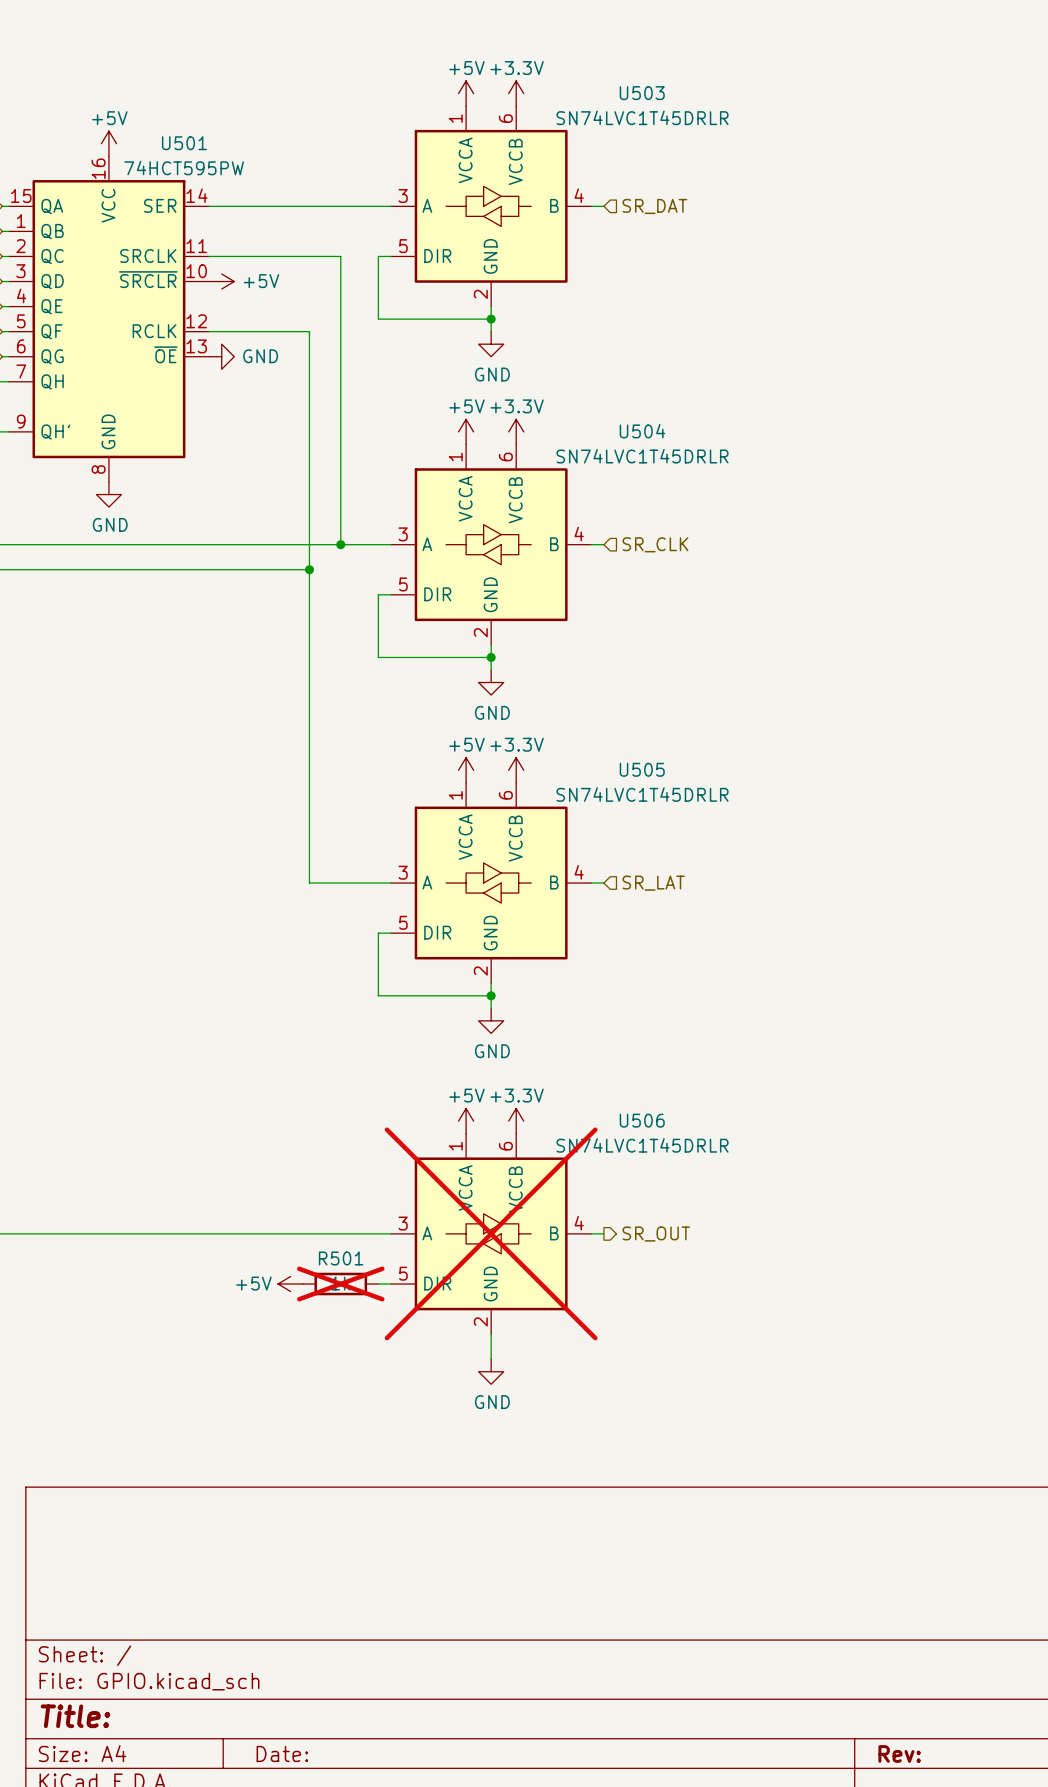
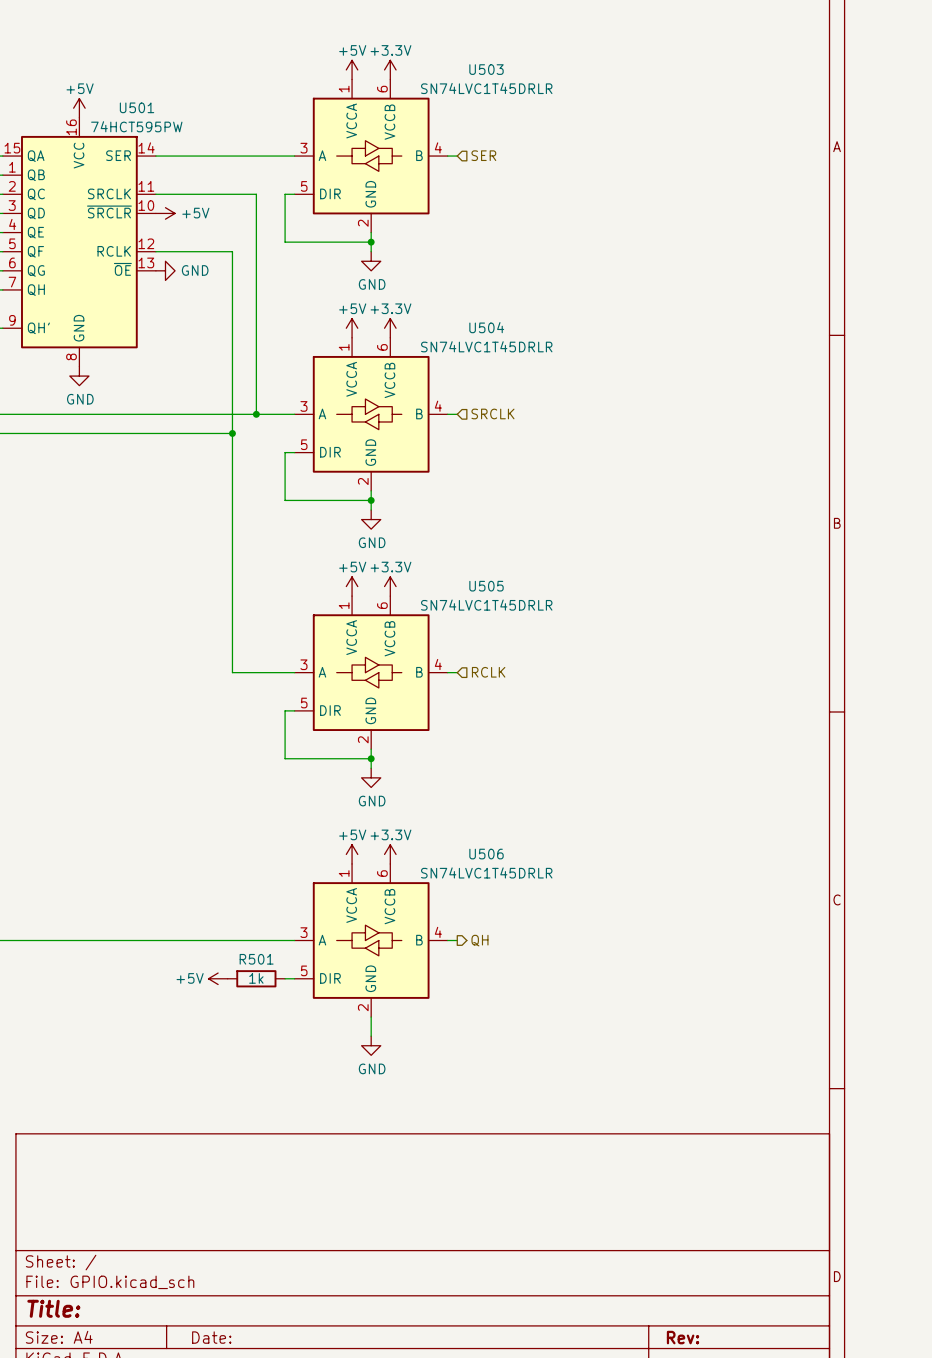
hierarchical label: SR_DAT (654, 206) -> SER (483, 155)
hierarchical label: SR_CLK (655, 544) -> SRCLK (492, 413)
hierarchical label: SR_LAT (653, 883) -> RCLK (488, 672)
U506 do-not-place cross: (491, 1233) -> none
hierarchical label: SR_OUT (656, 1234) -> QH (479, 940)
R501 do-not-place cross: (340, 1284) -> none

